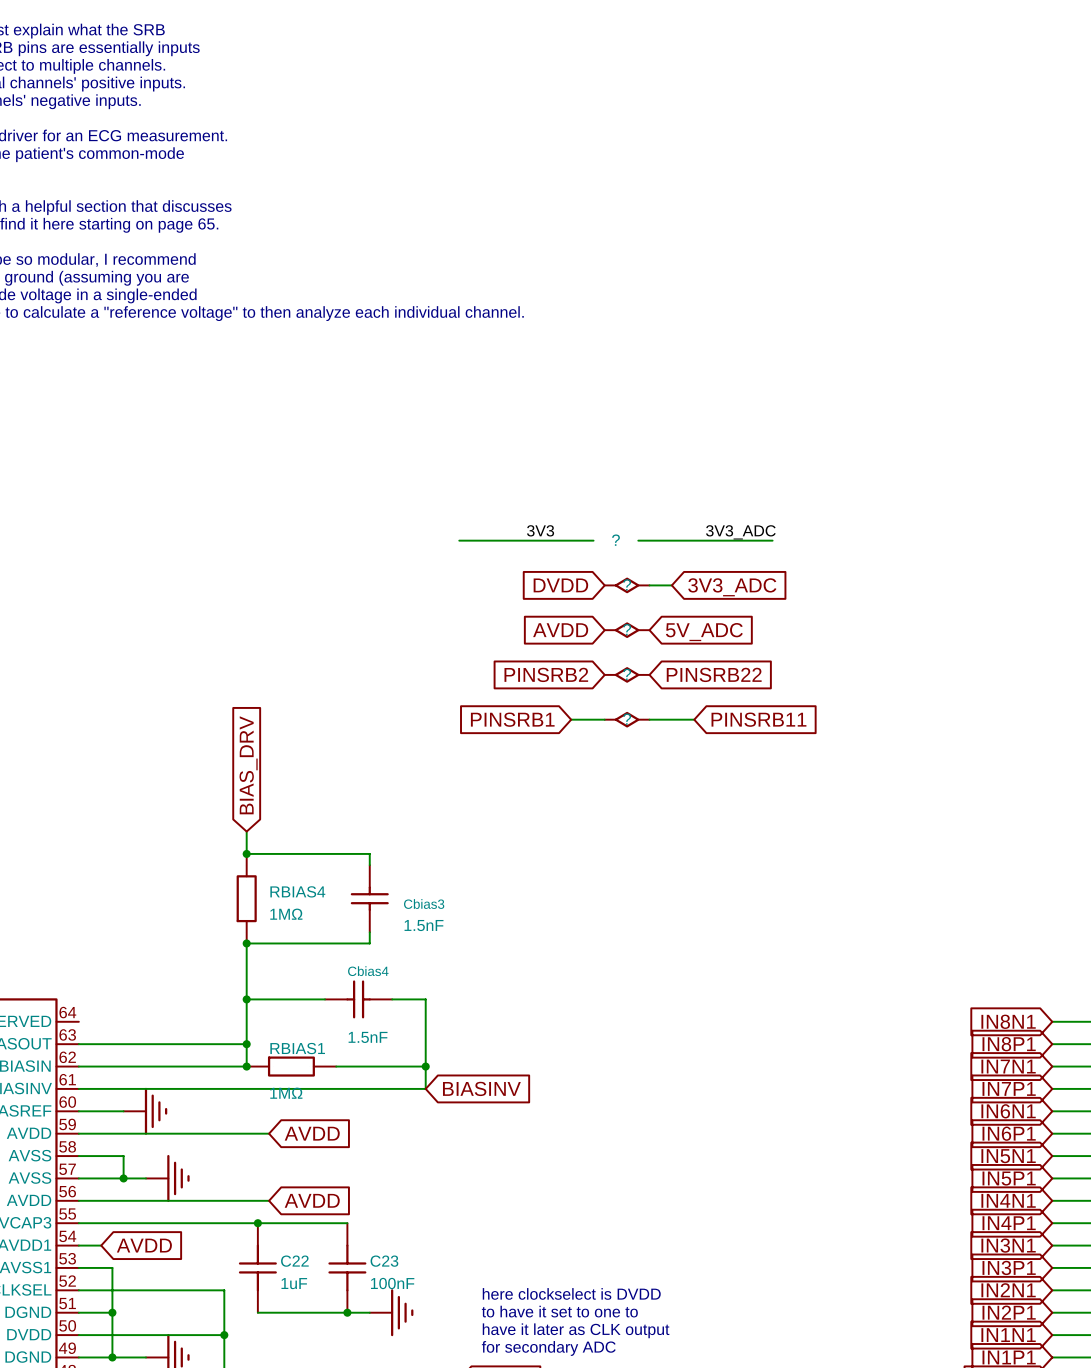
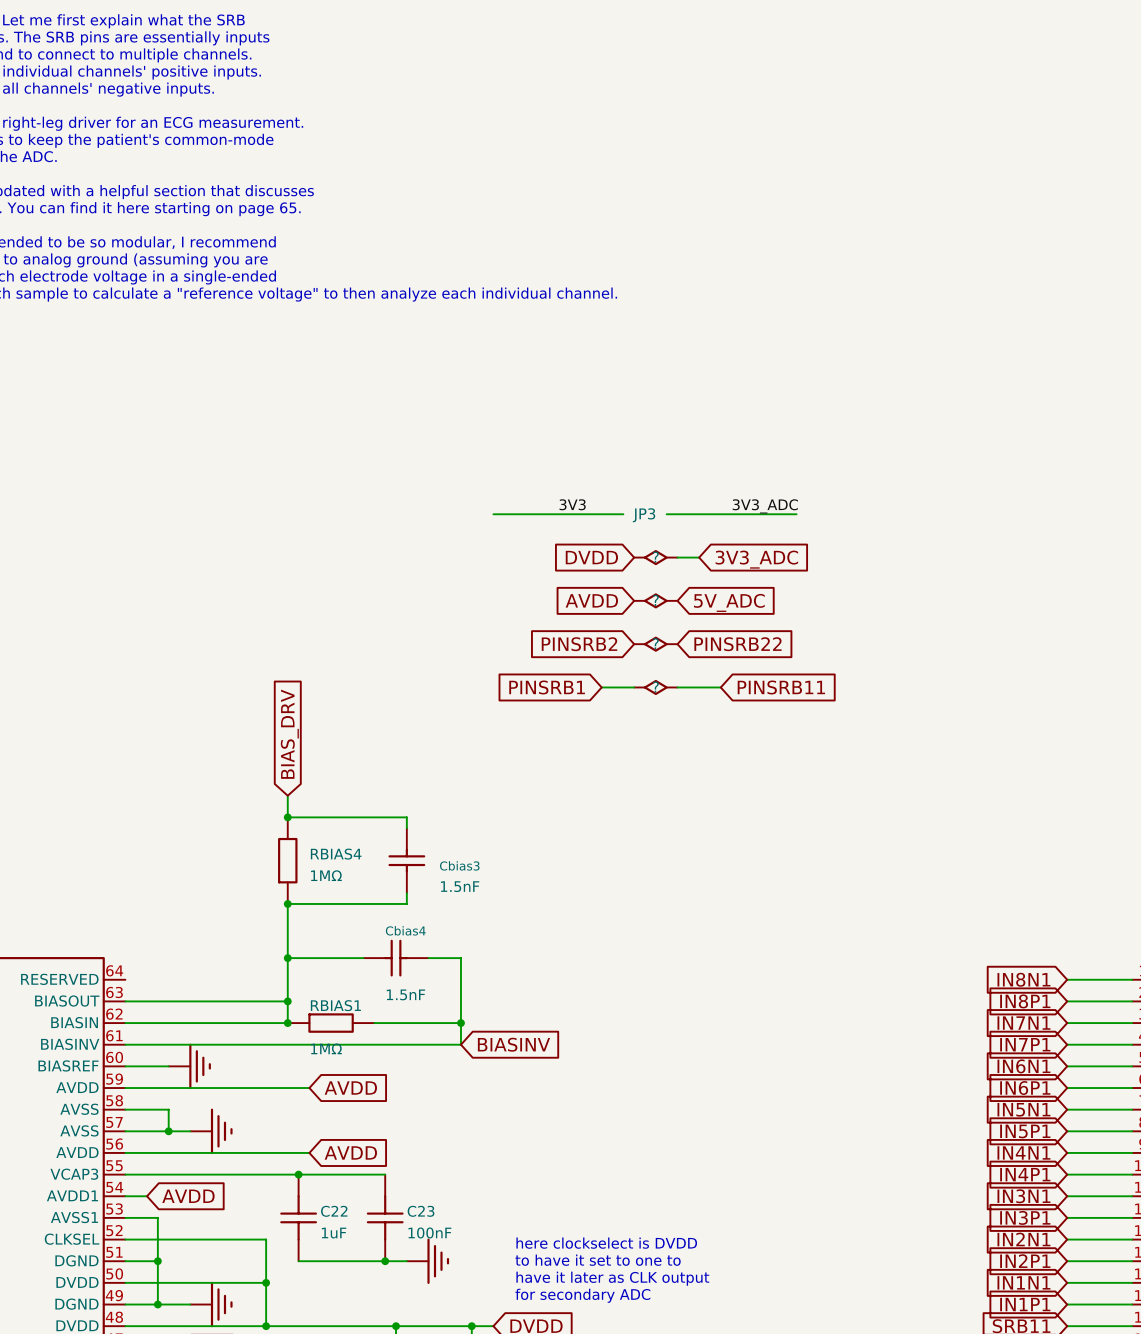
JP3 name: ? (615, 540) -> JP3 (644, 515)

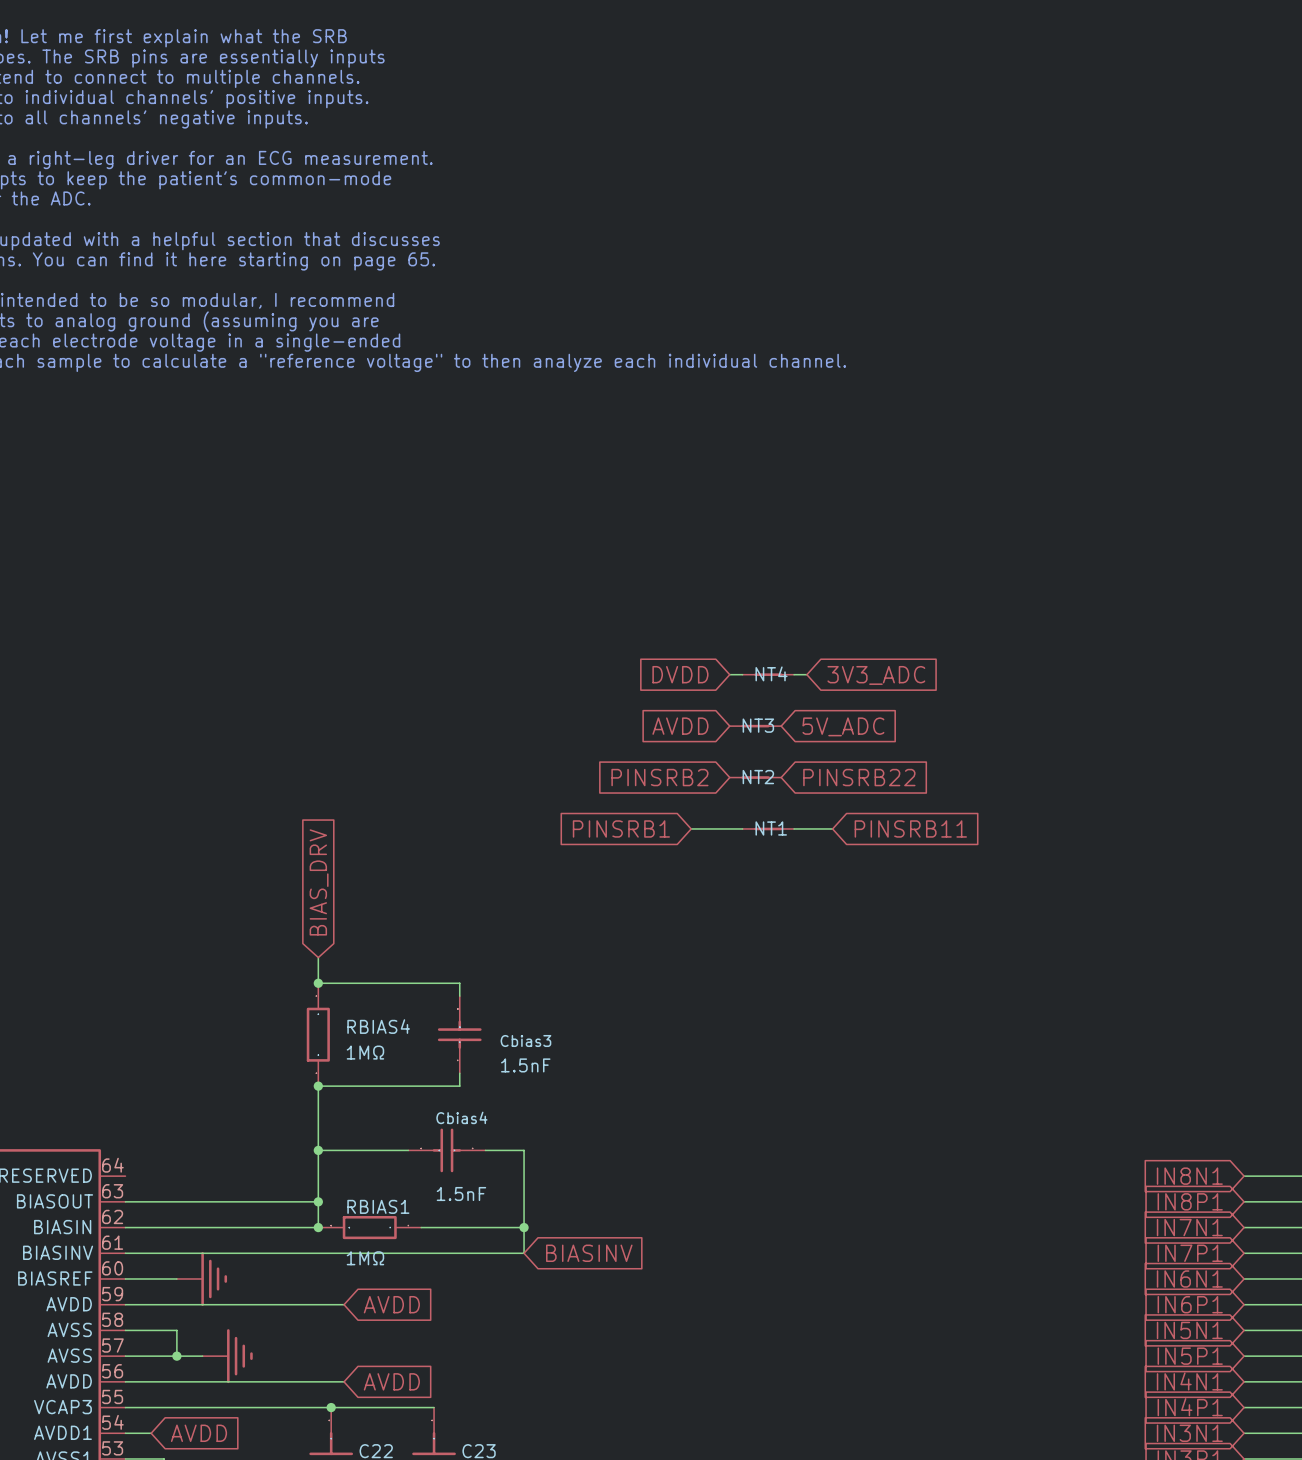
label: 3V3 (572, 504) -> none
label: 3V3_ADC (765, 506) -> none
wire: (493, 514) (623, 514) -> none
wire: (666, 514) (796, 514) -> none
JP3: (644, 515) -> none
part: (655, 557) -> none
NT4: none -> (768, 674)
part: (655, 600) -> none
NT3: none -> (755, 726)
part: (655, 644) -> none
NT2: none -> (755, 777)
part: (655, 687) -> none
NT1: none -> (768, 828)

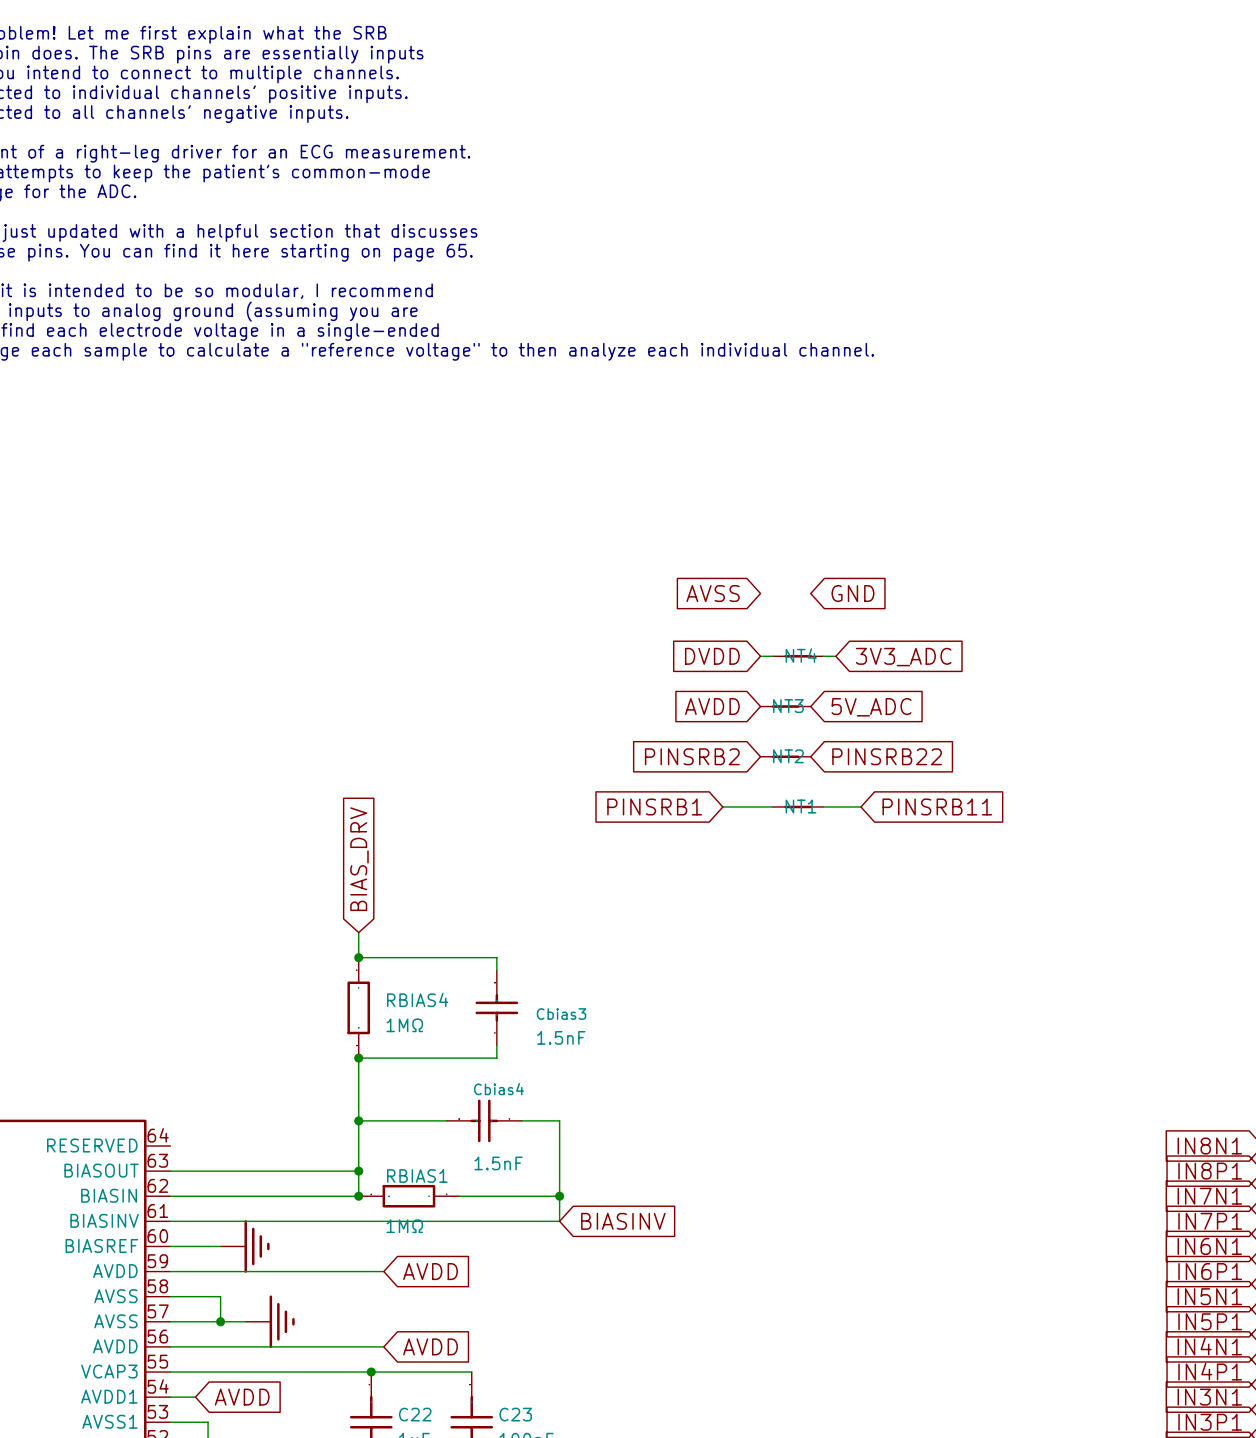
global label: none -> AVSS (713, 593)
global label: none -> GND (852, 593)

